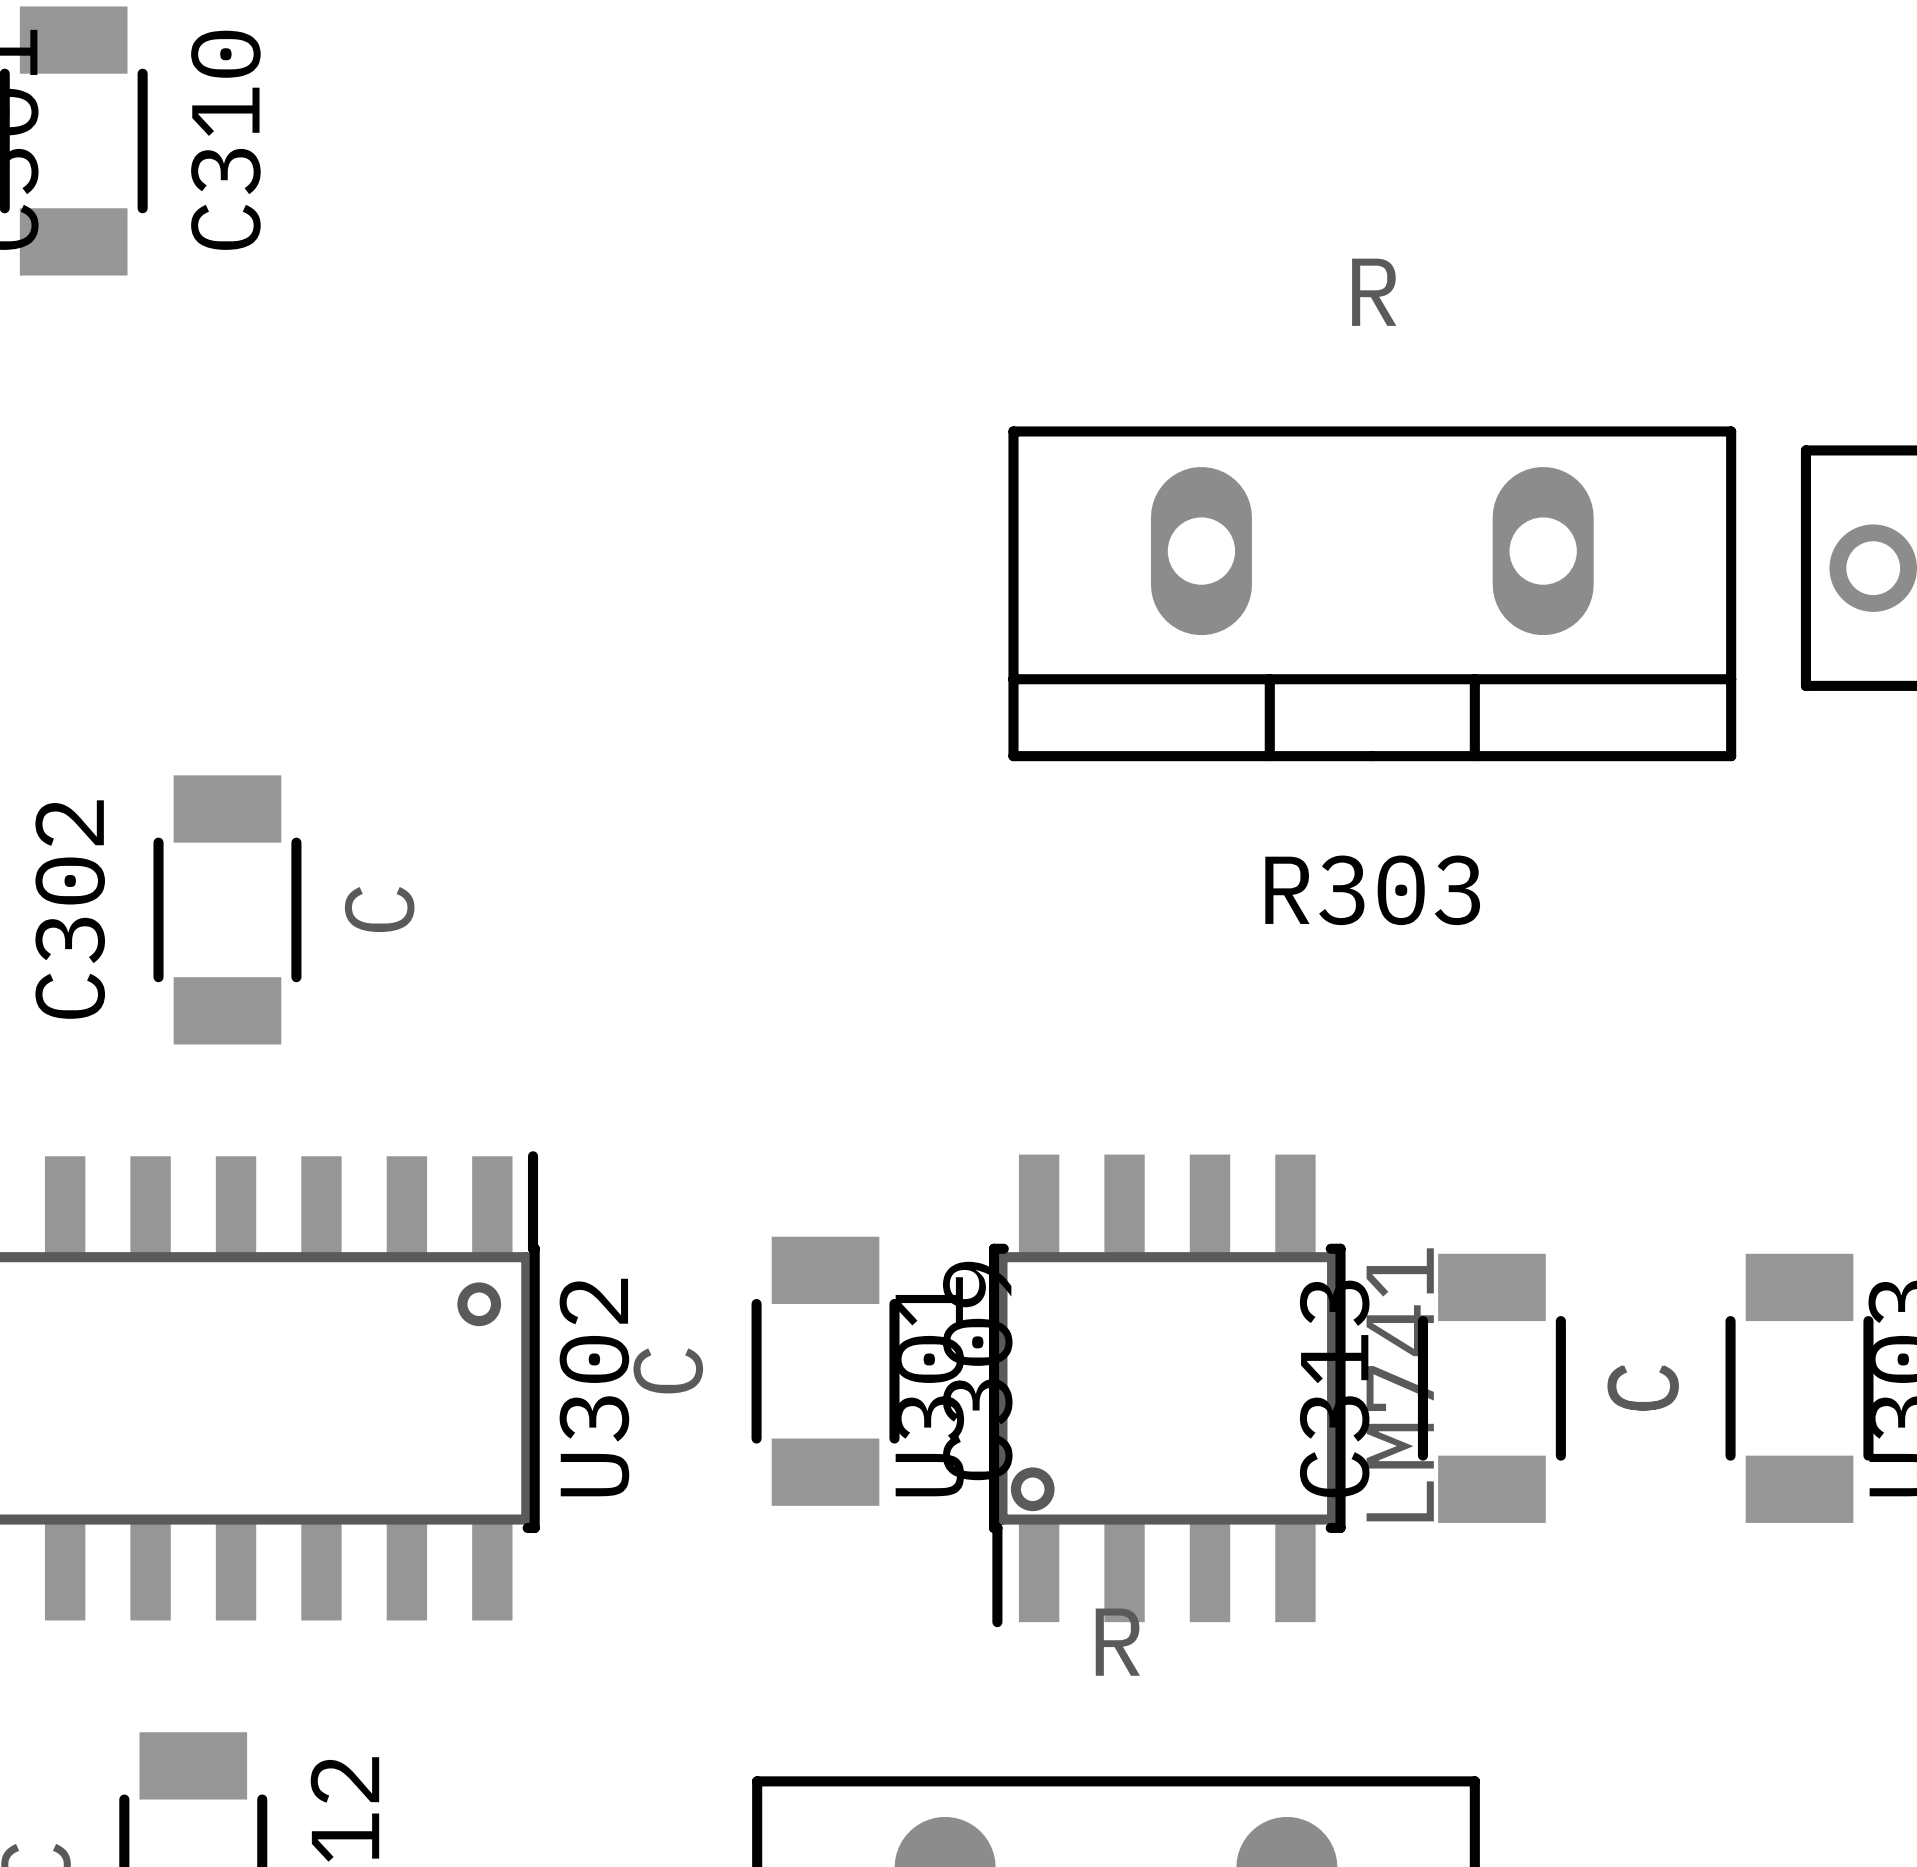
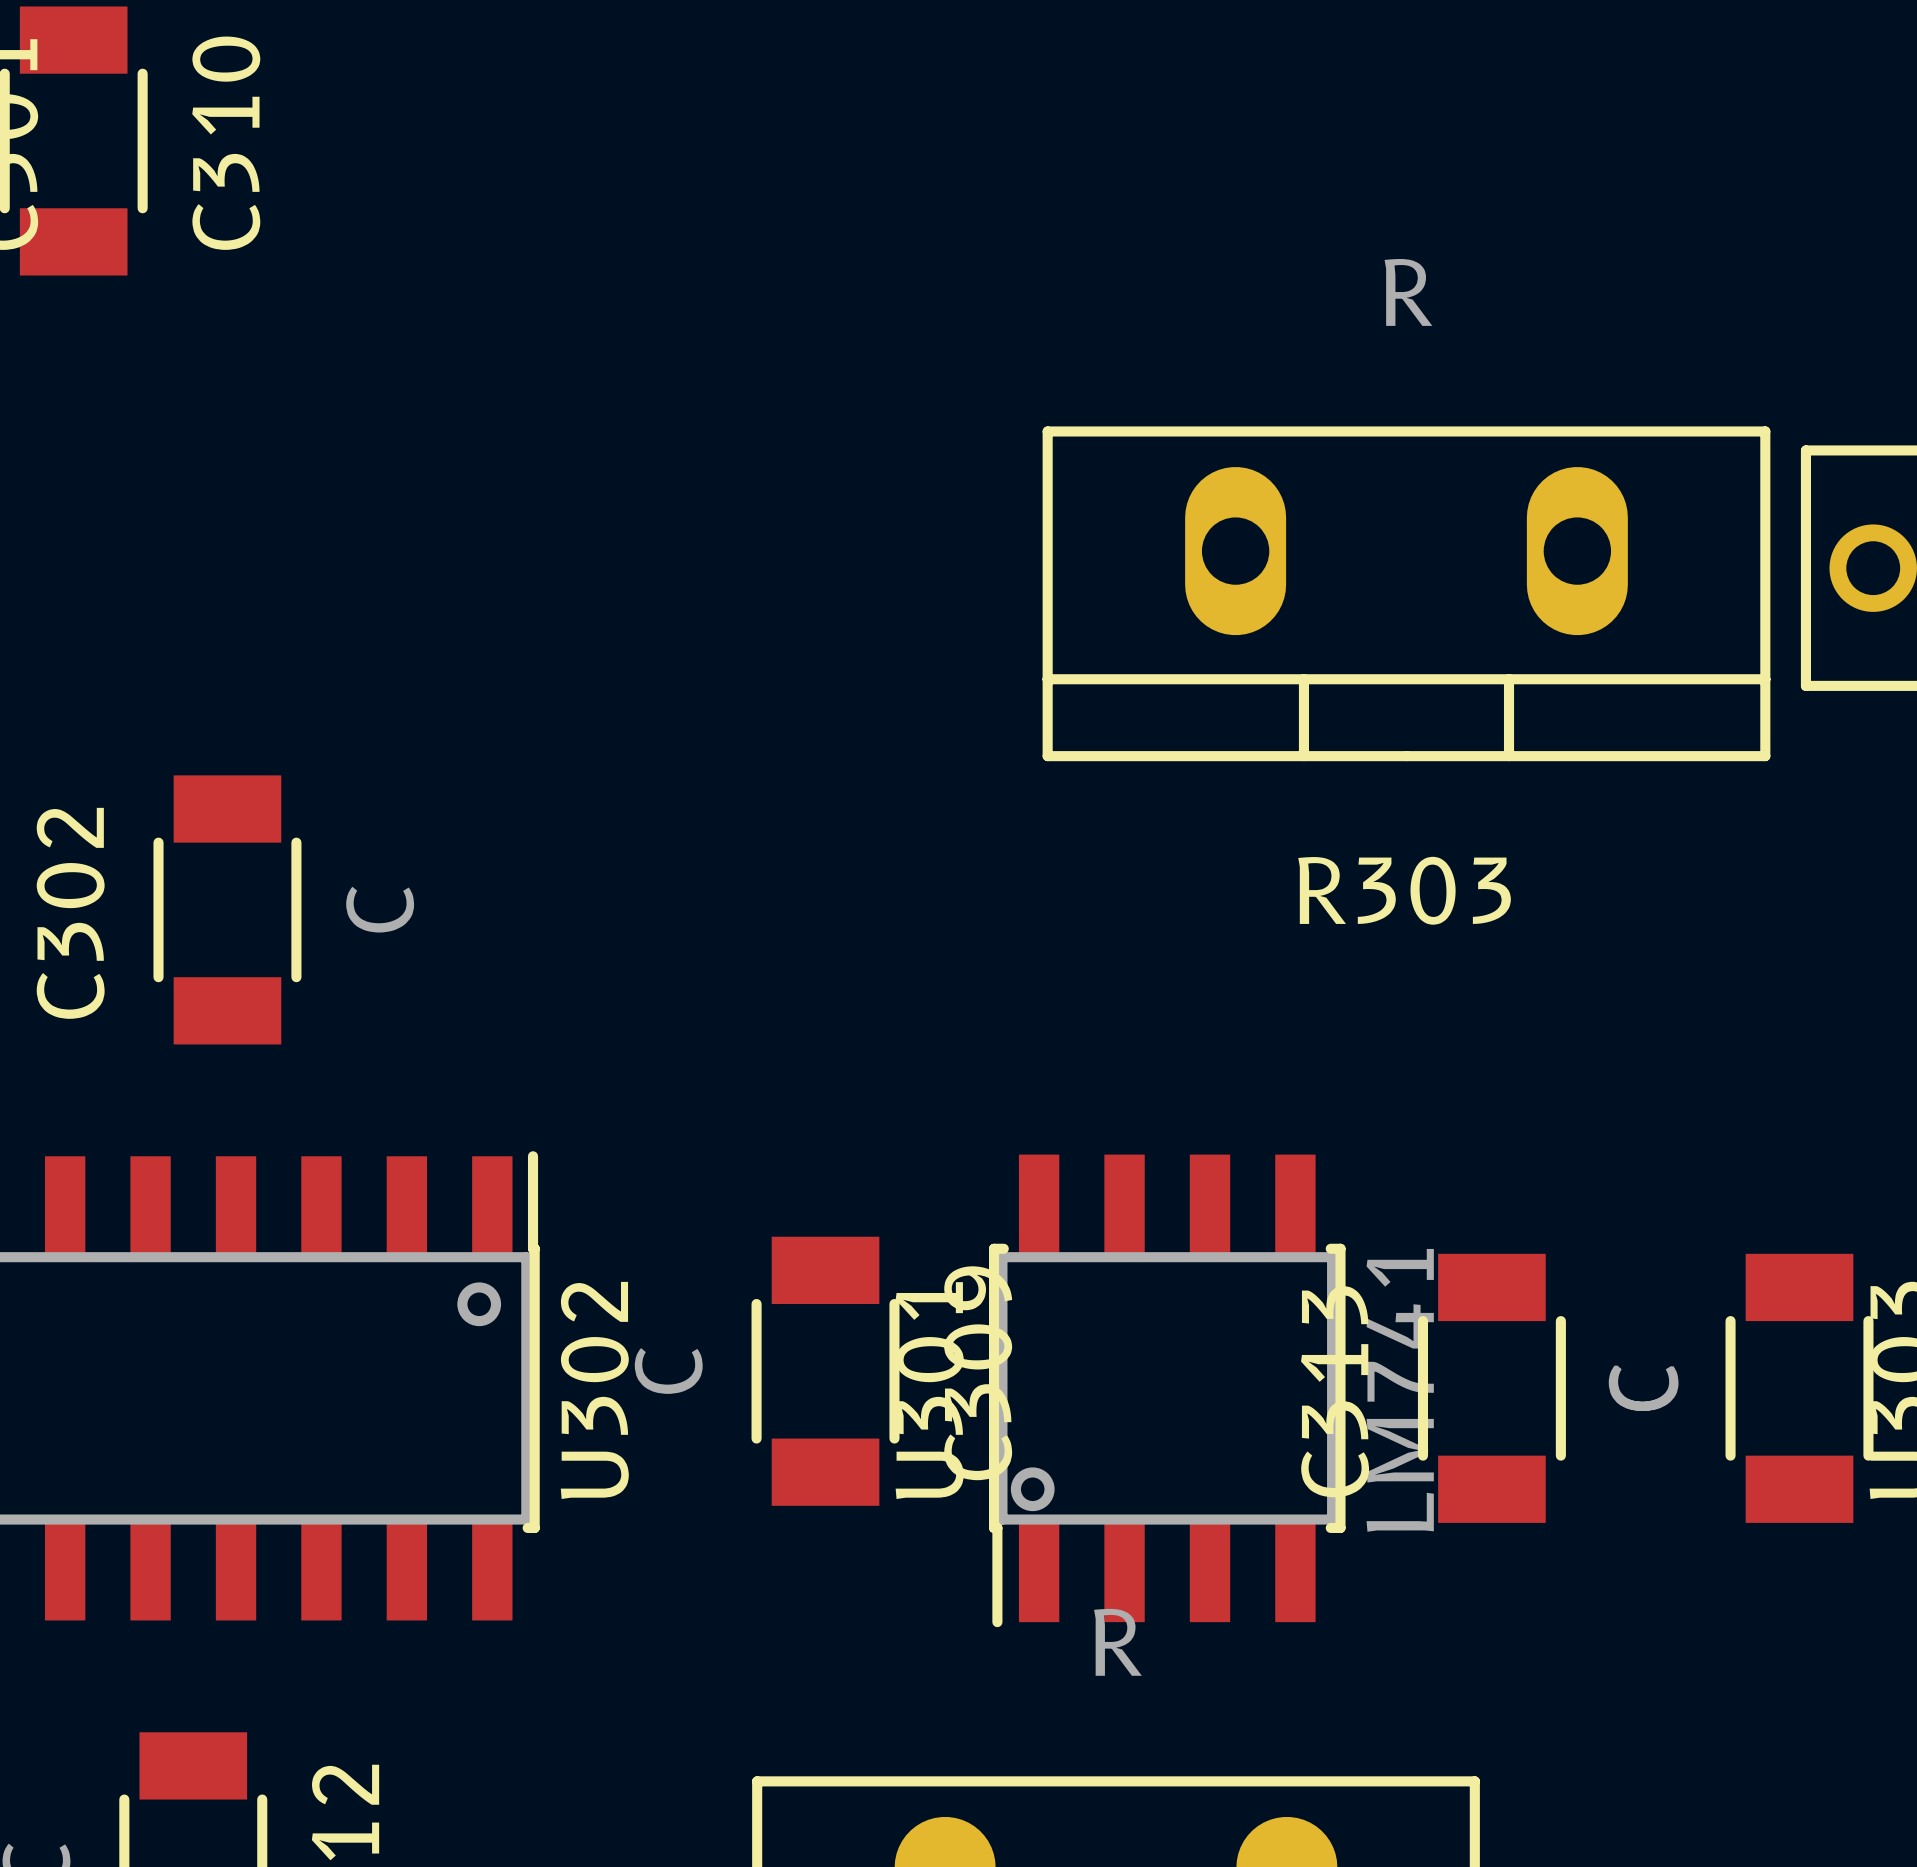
R303 position: (1372, 593) -> (1406, 593)

